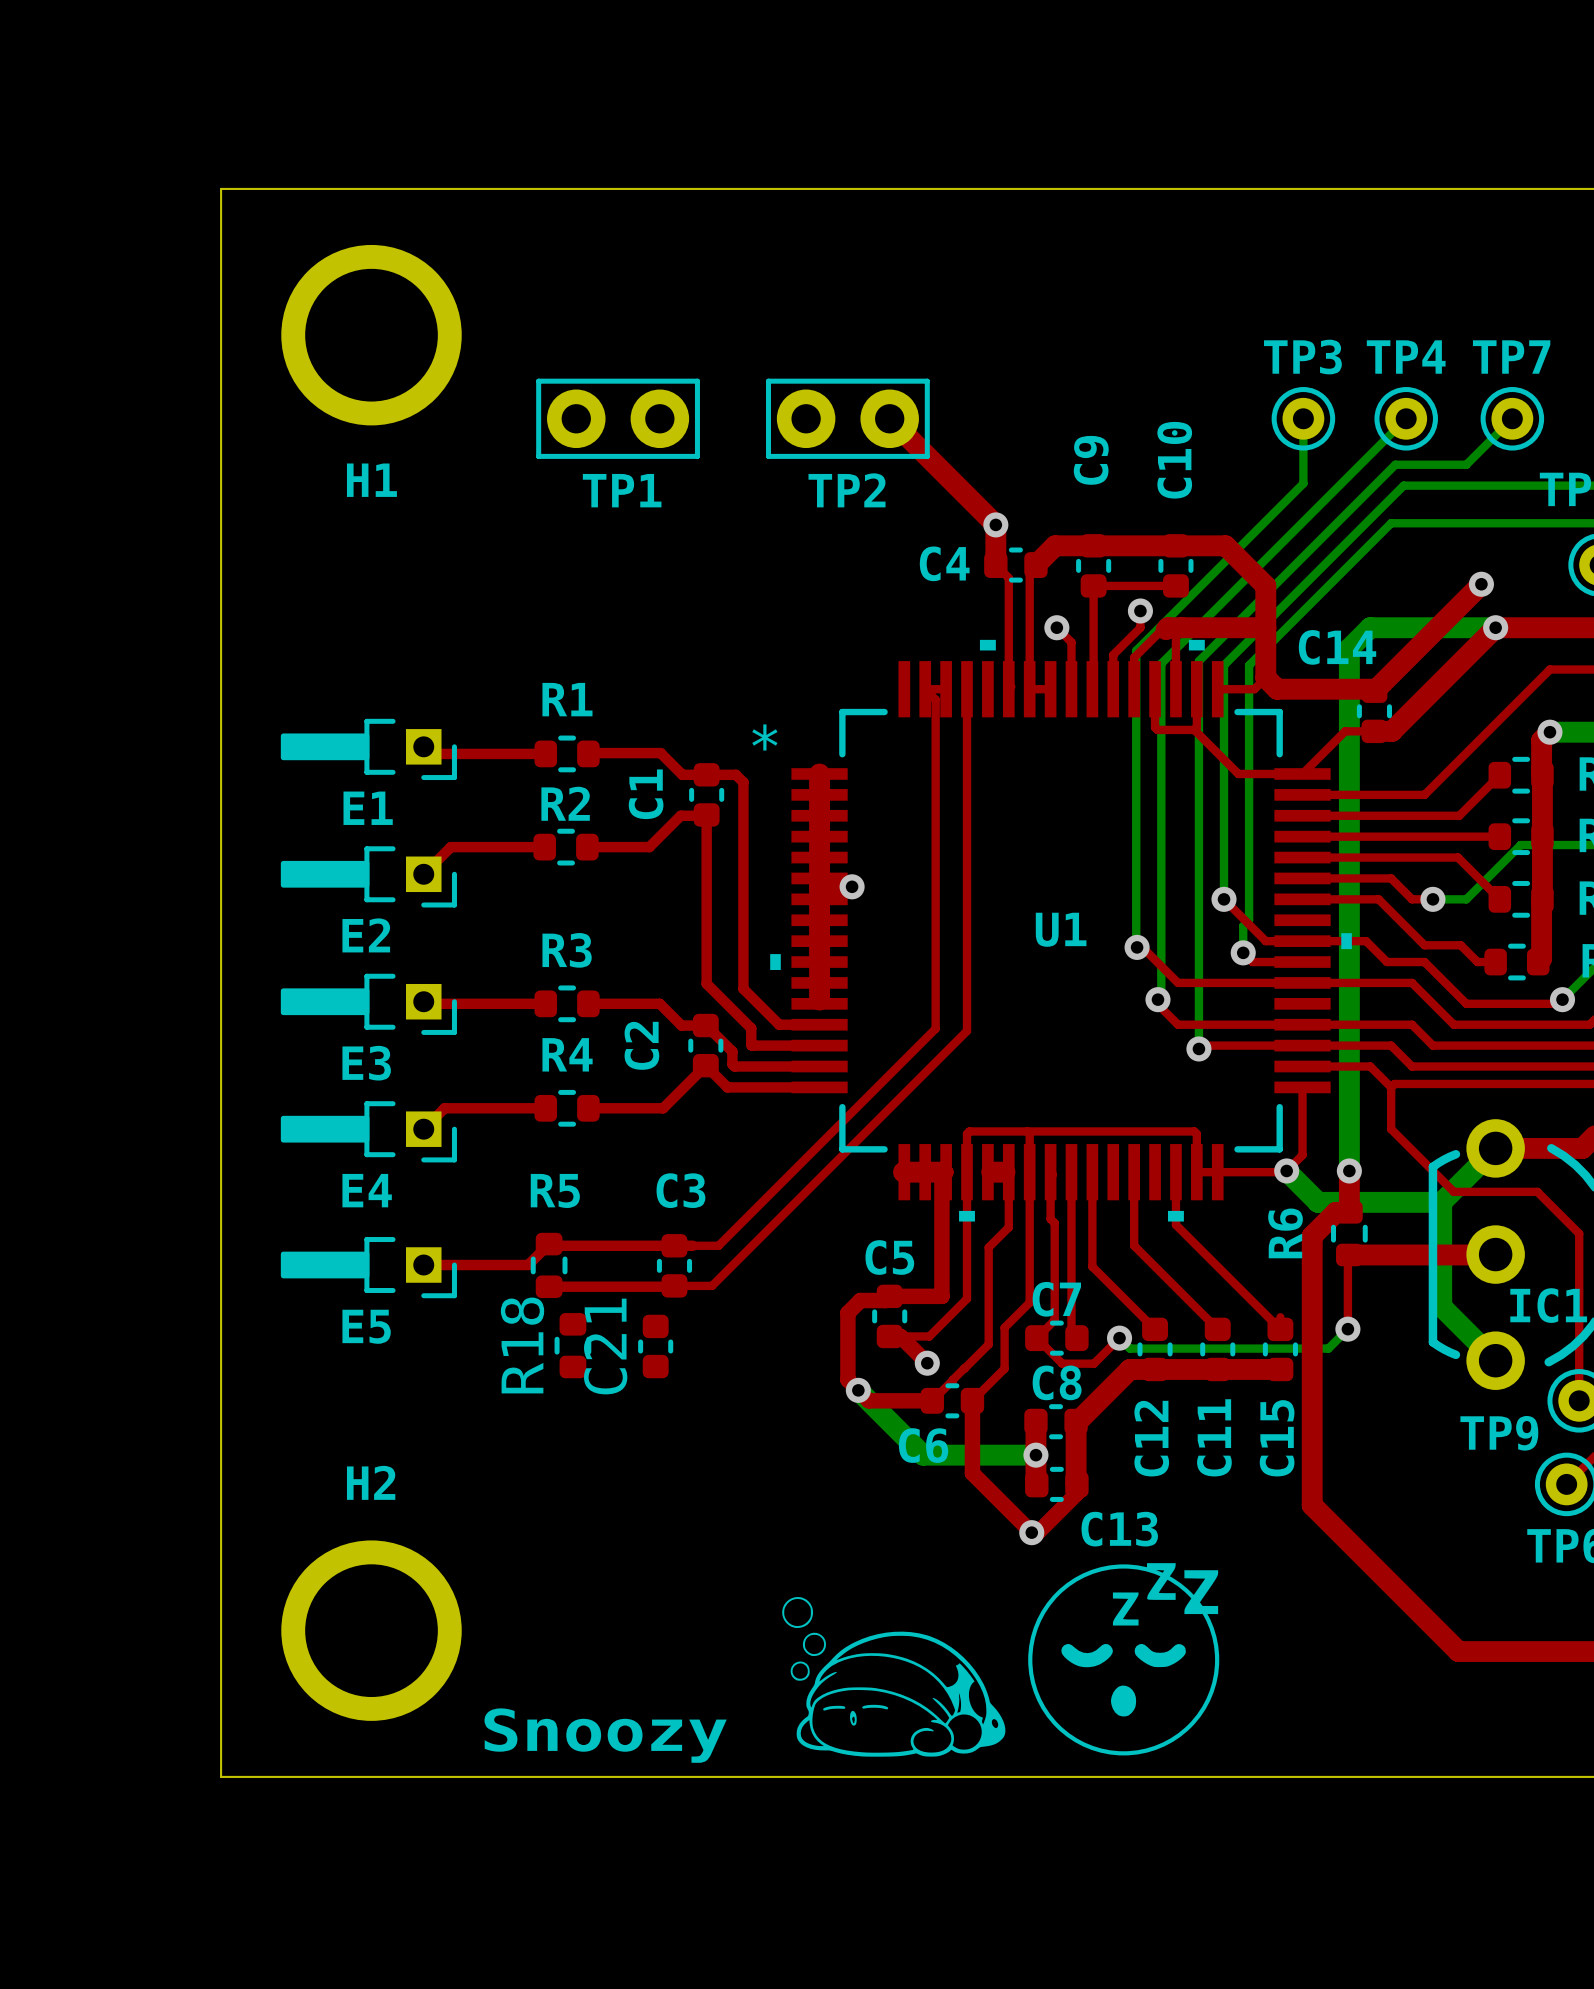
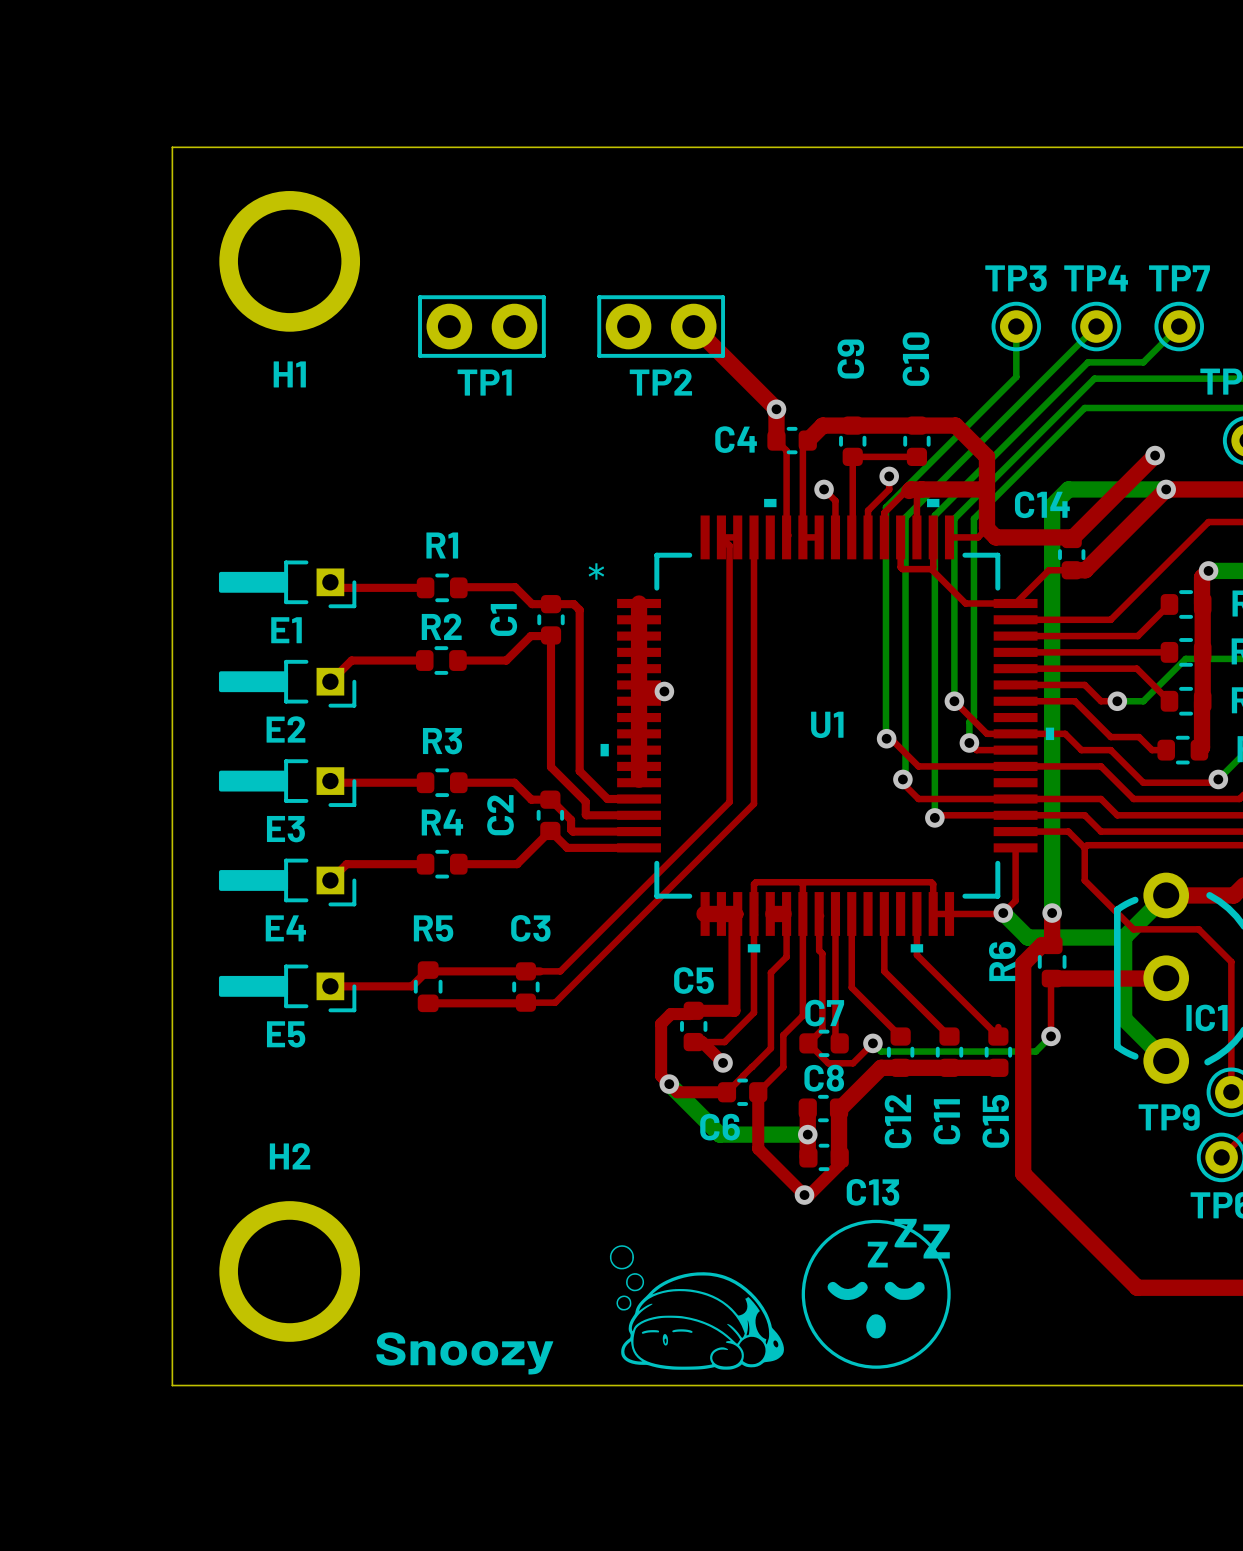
R18: (572, 1345) -> none
C21: (655, 1346) -> none

